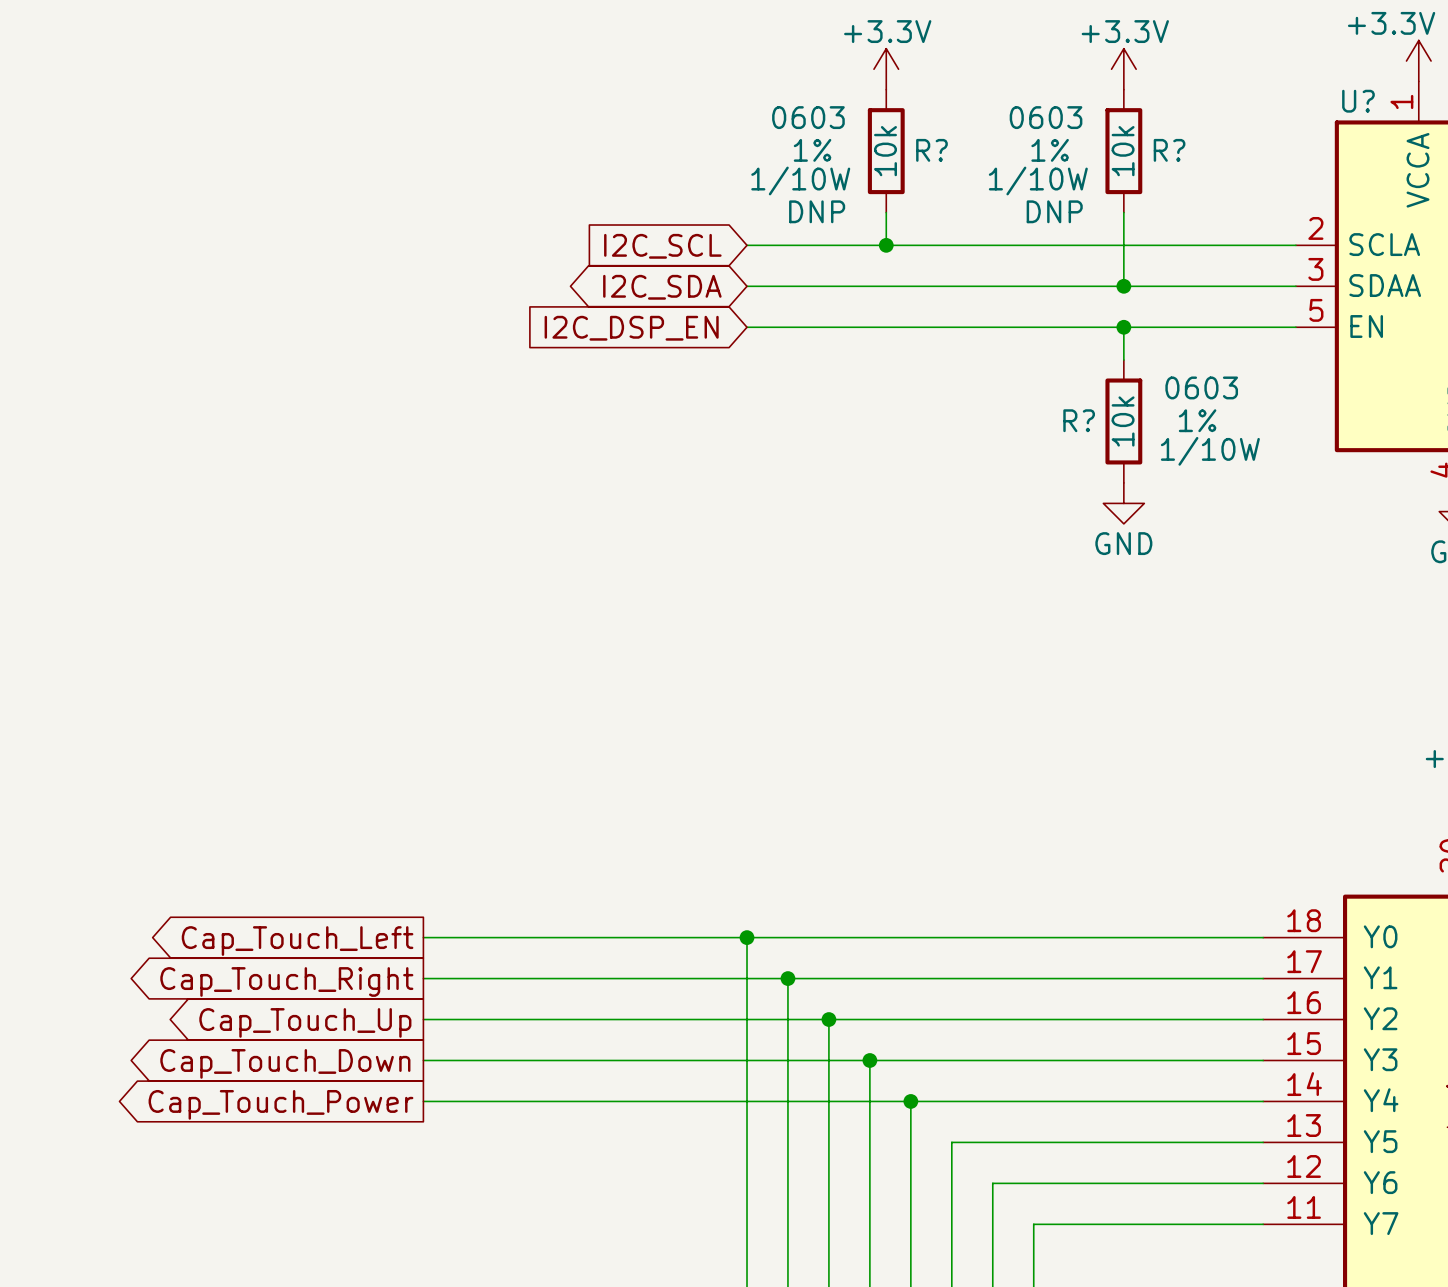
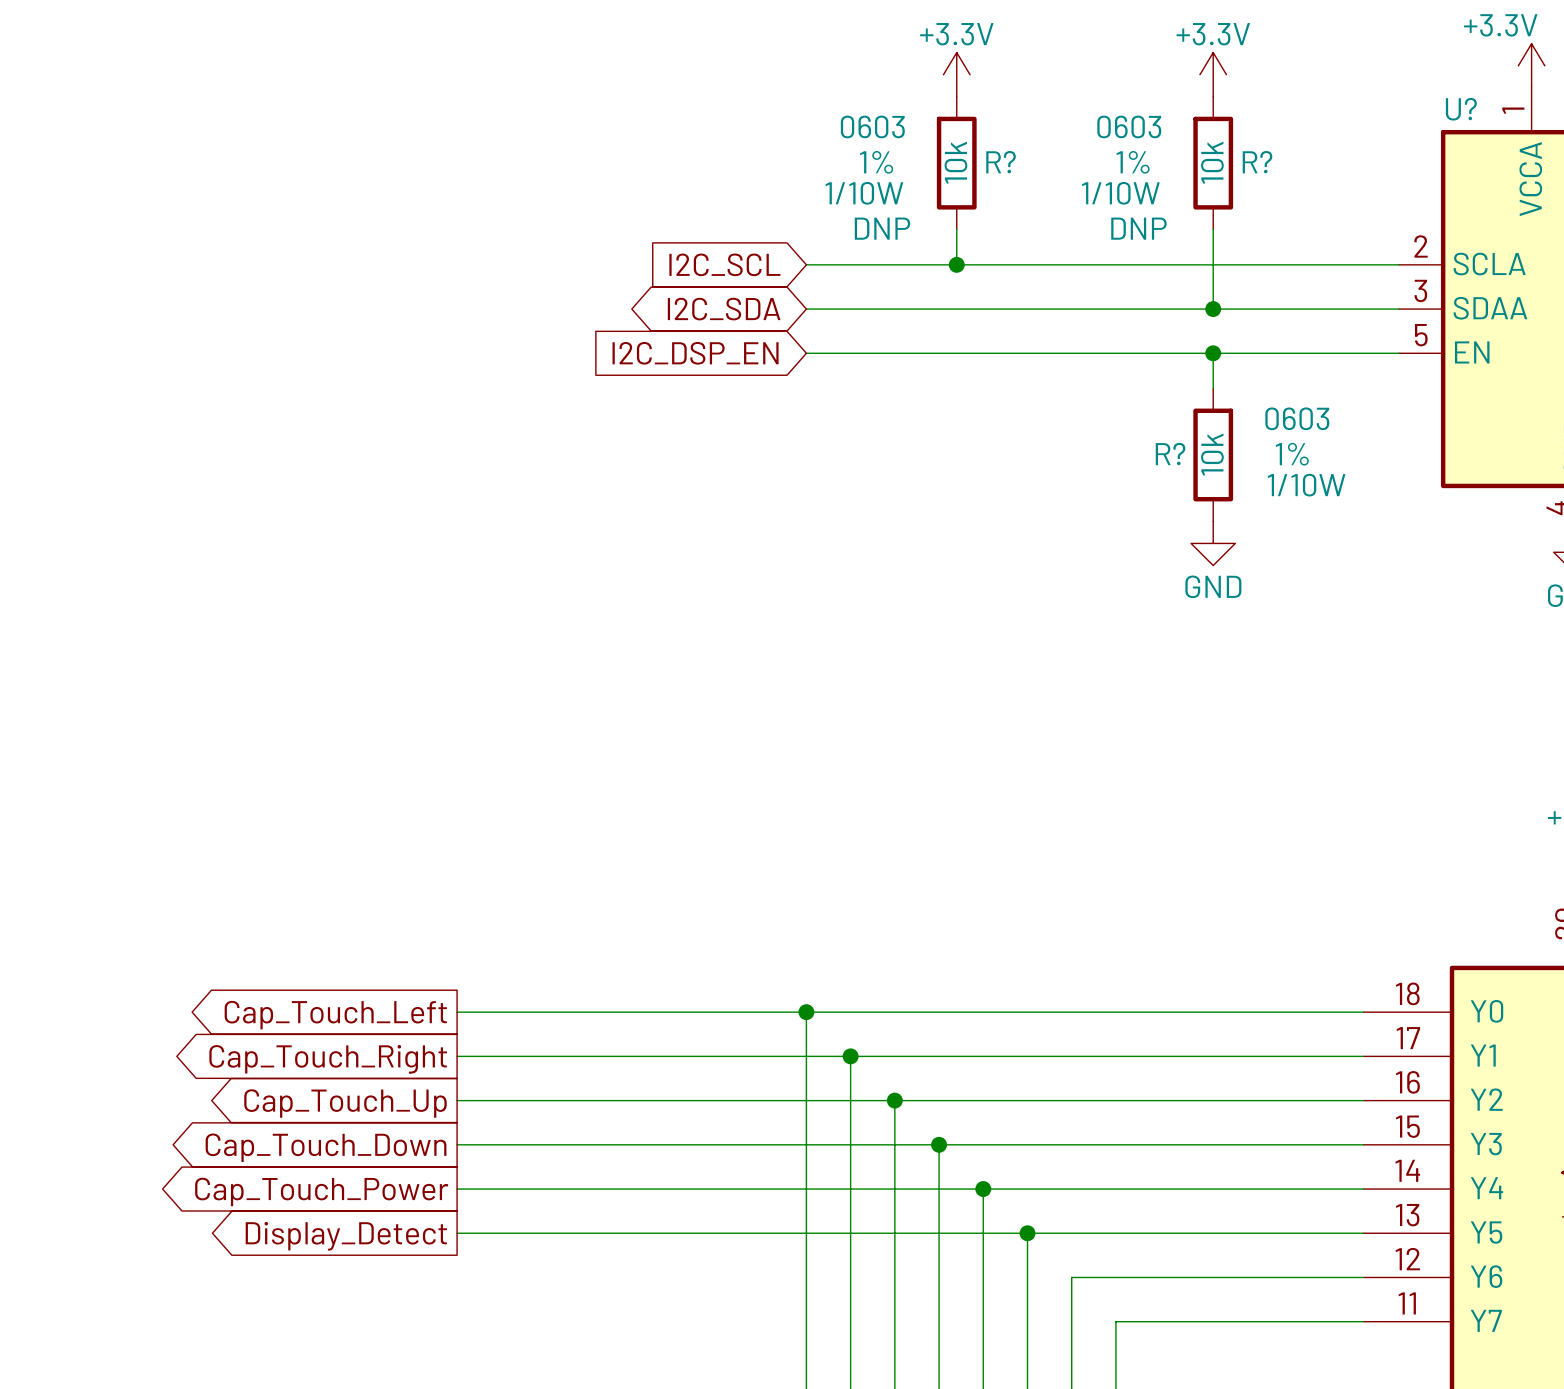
wire: none -> (457, 1233) (1027, 1233)
junction: none -> (1027, 1233)
global label: none -> Display_Detect (346, 1236)

